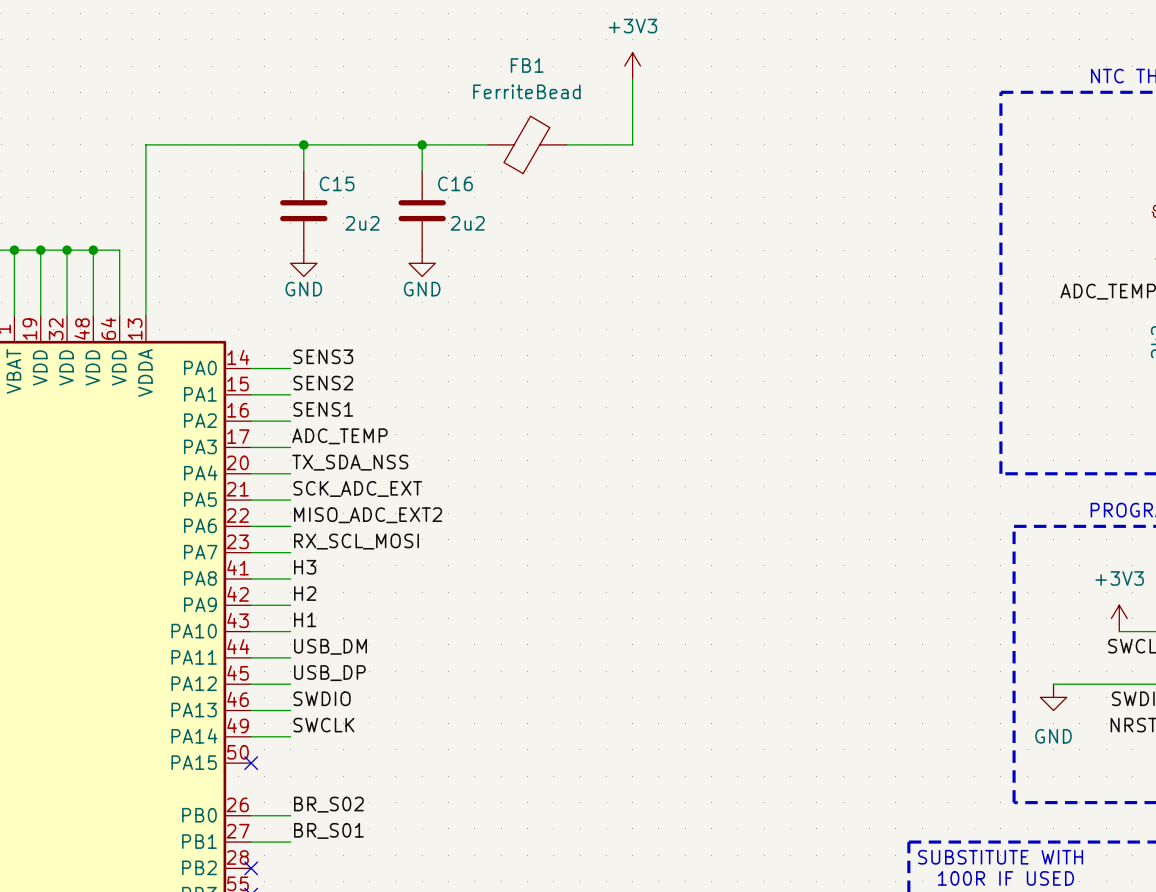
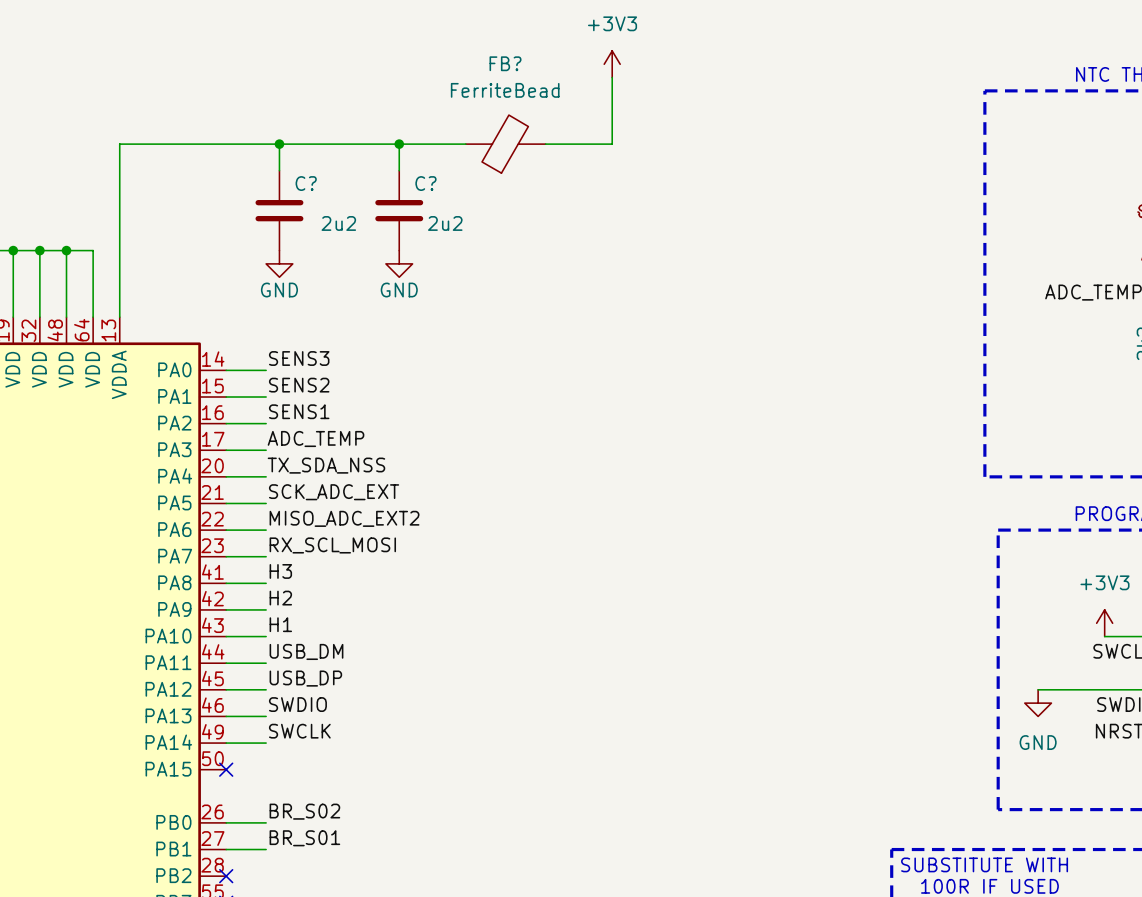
FB1 name: FB1 (527, 65) -> FB? (505, 63)
C15 name: C15 (337, 183) -> C? (306, 183)
C16 name: C16 (455, 183) -> C? (425, 183)

